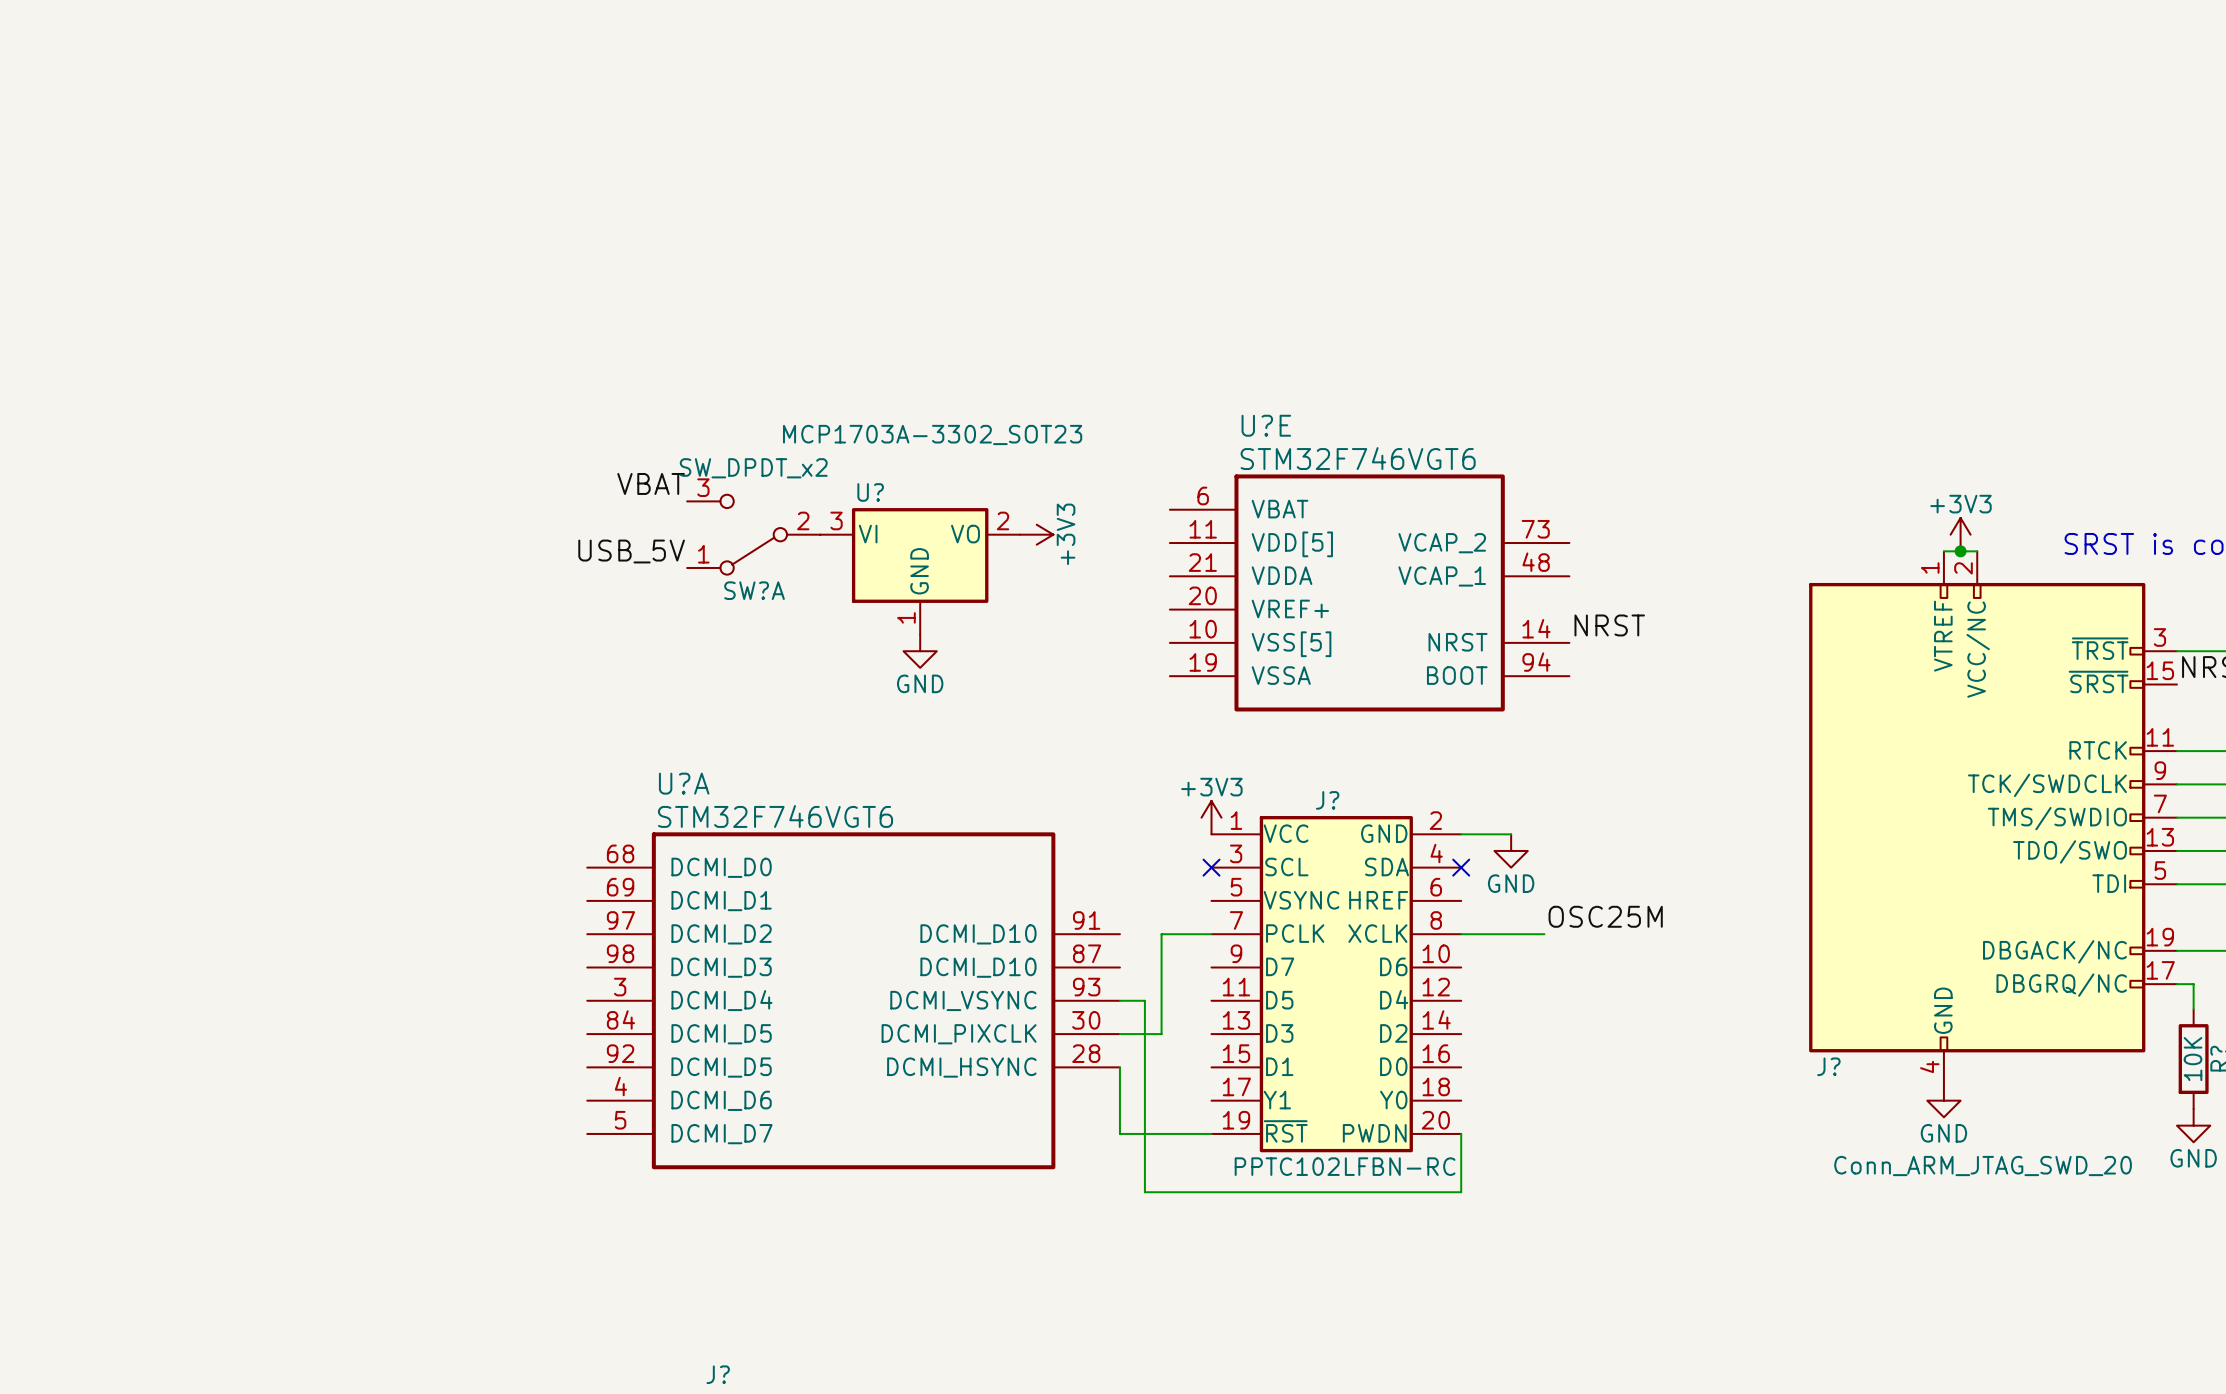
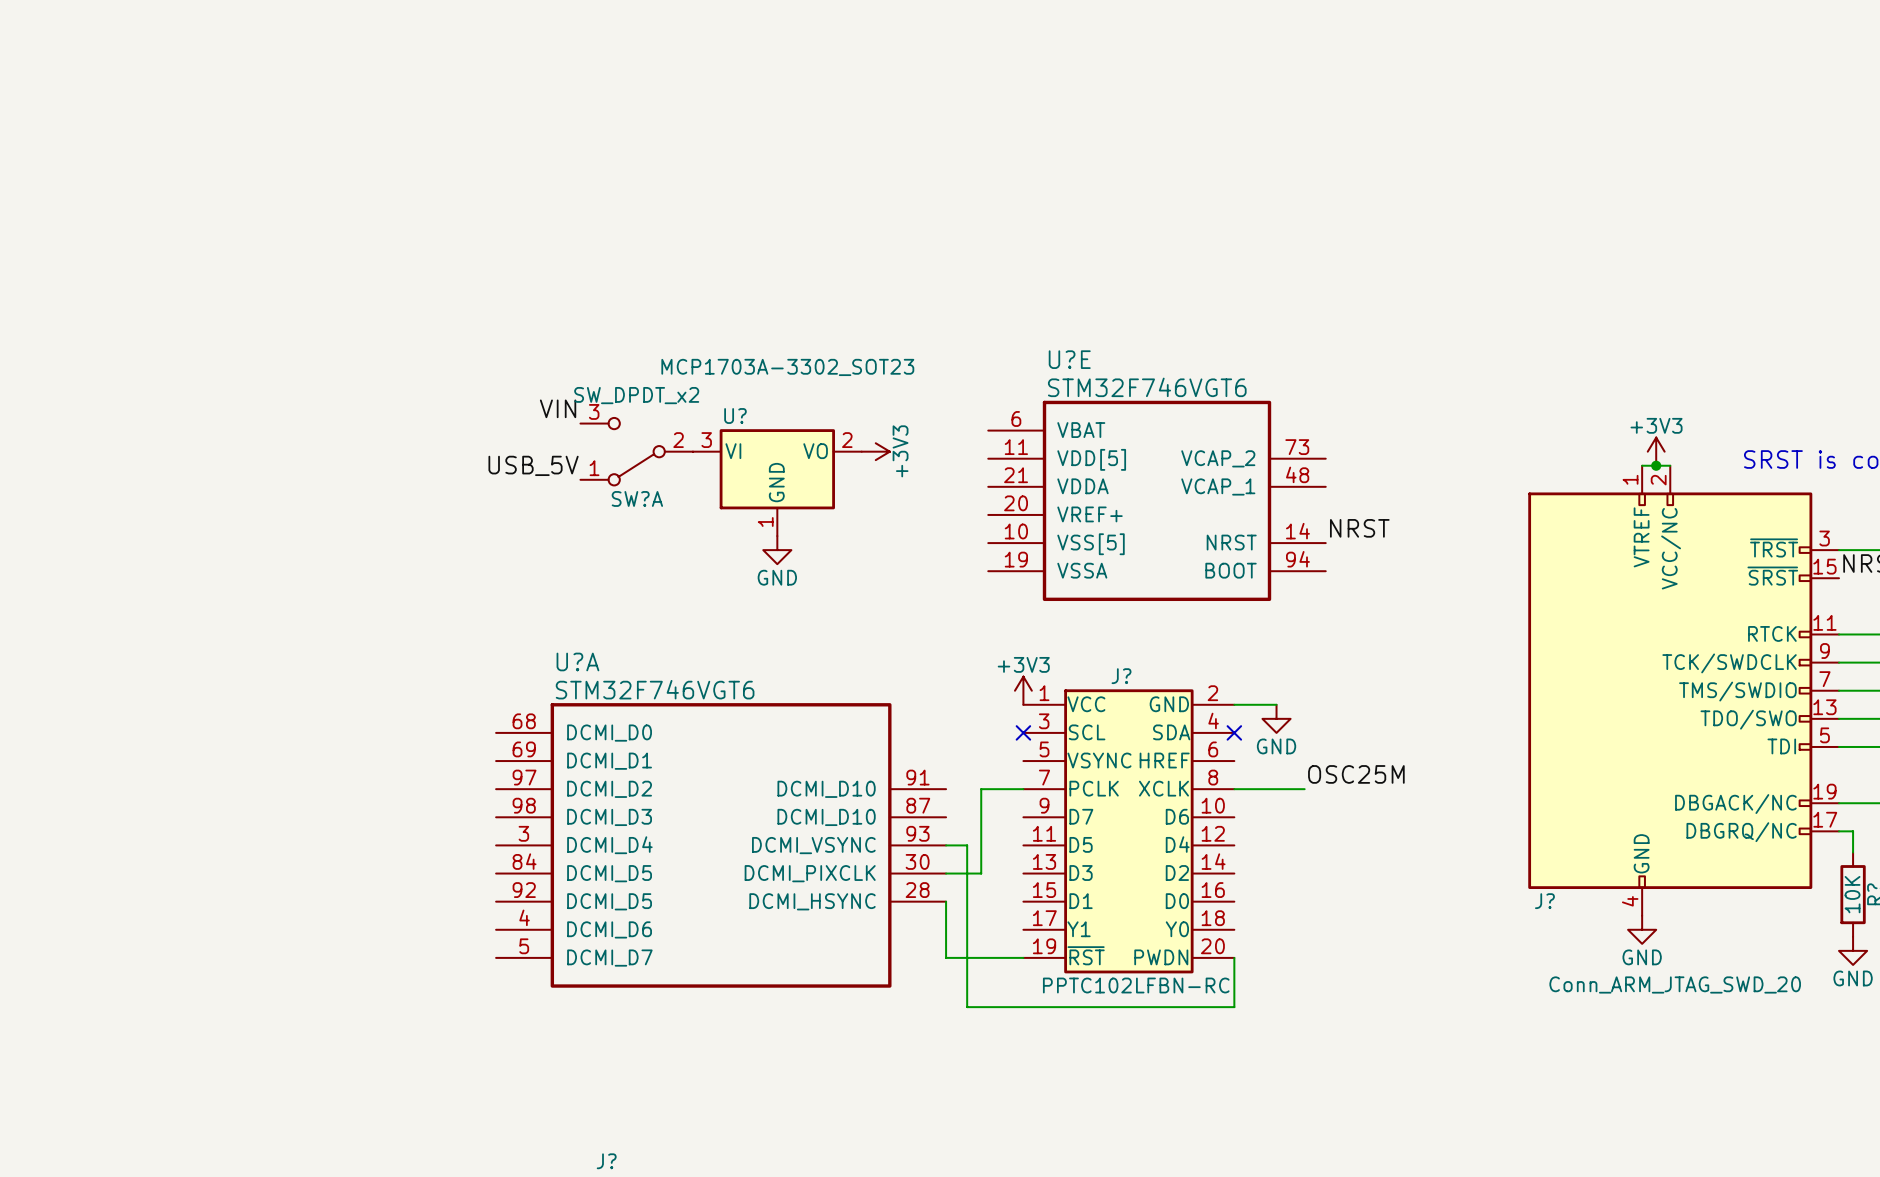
label: VBAT (651, 483) -> VIN (558, 408)

